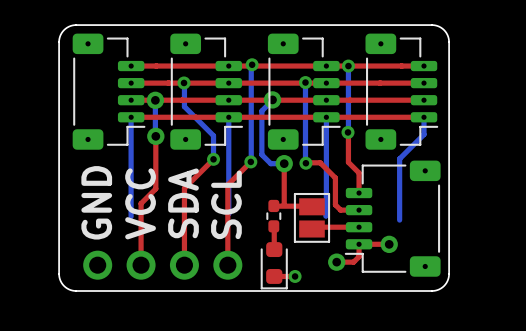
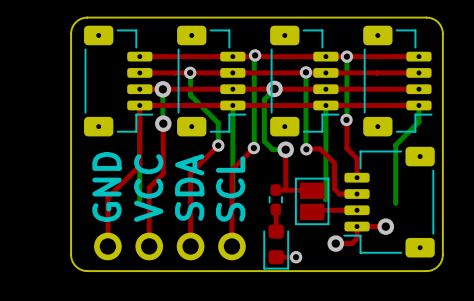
top track: none -> (139, 105) (139, 165) (107, 197) (107, 246)

